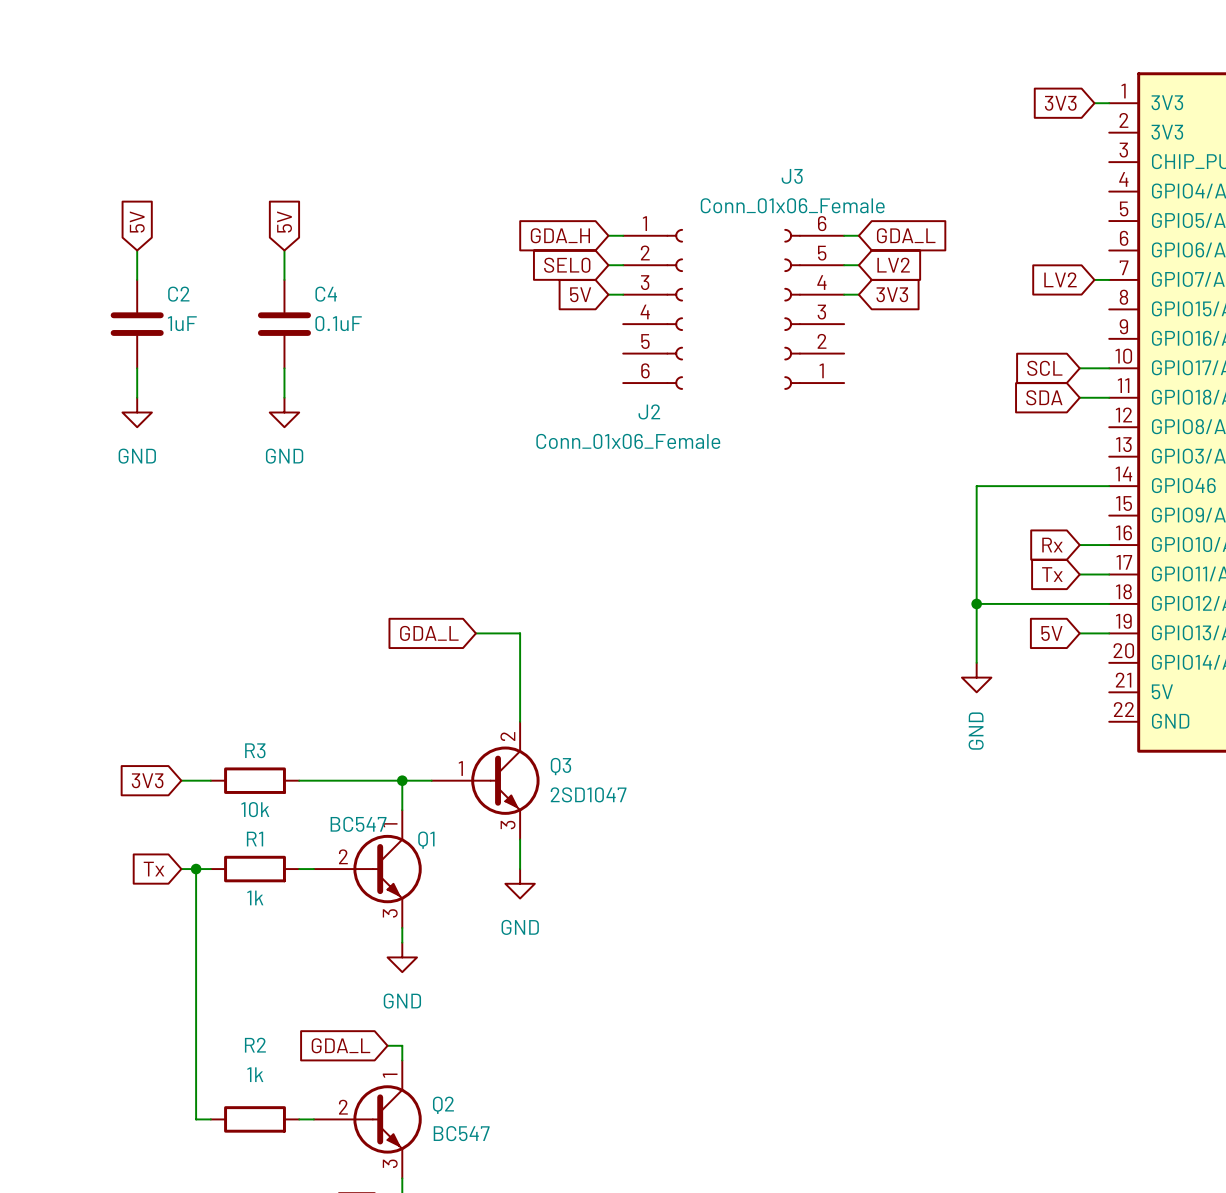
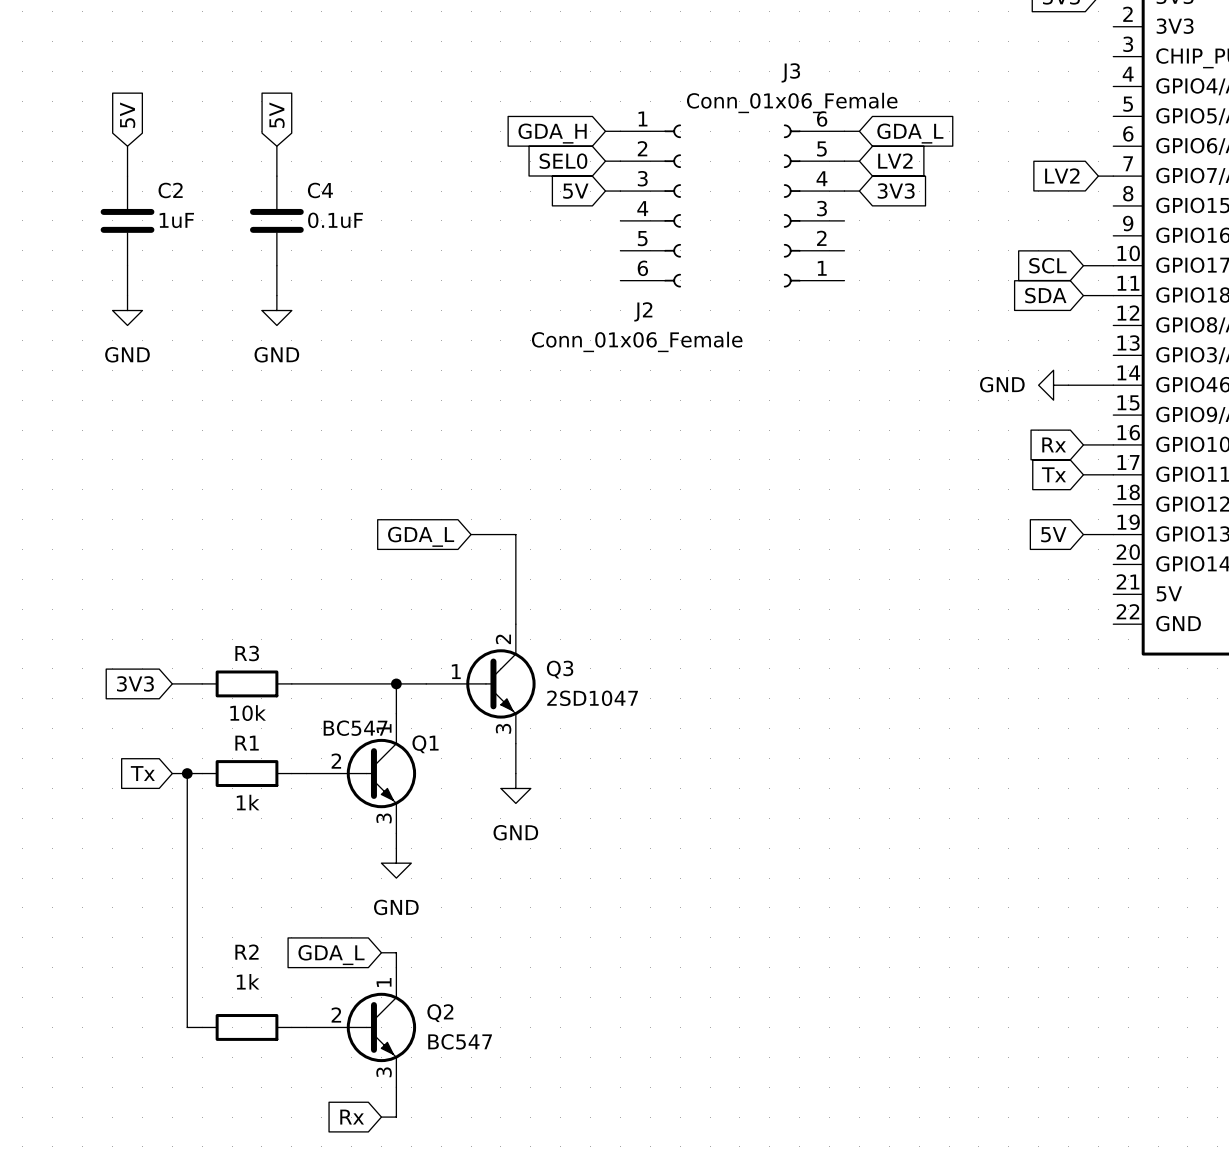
wire: (1065, 486) (976, 486) (976, 662) -> none
wire: (976, 603) (1109, 603) -> none
junction: (976, 603) -> none
power symbol rotation: 0° (976, 677) -> 90° clockwise (1053, 385)
power symbol position: GND (976, 677) -> GND (1053, 385)

